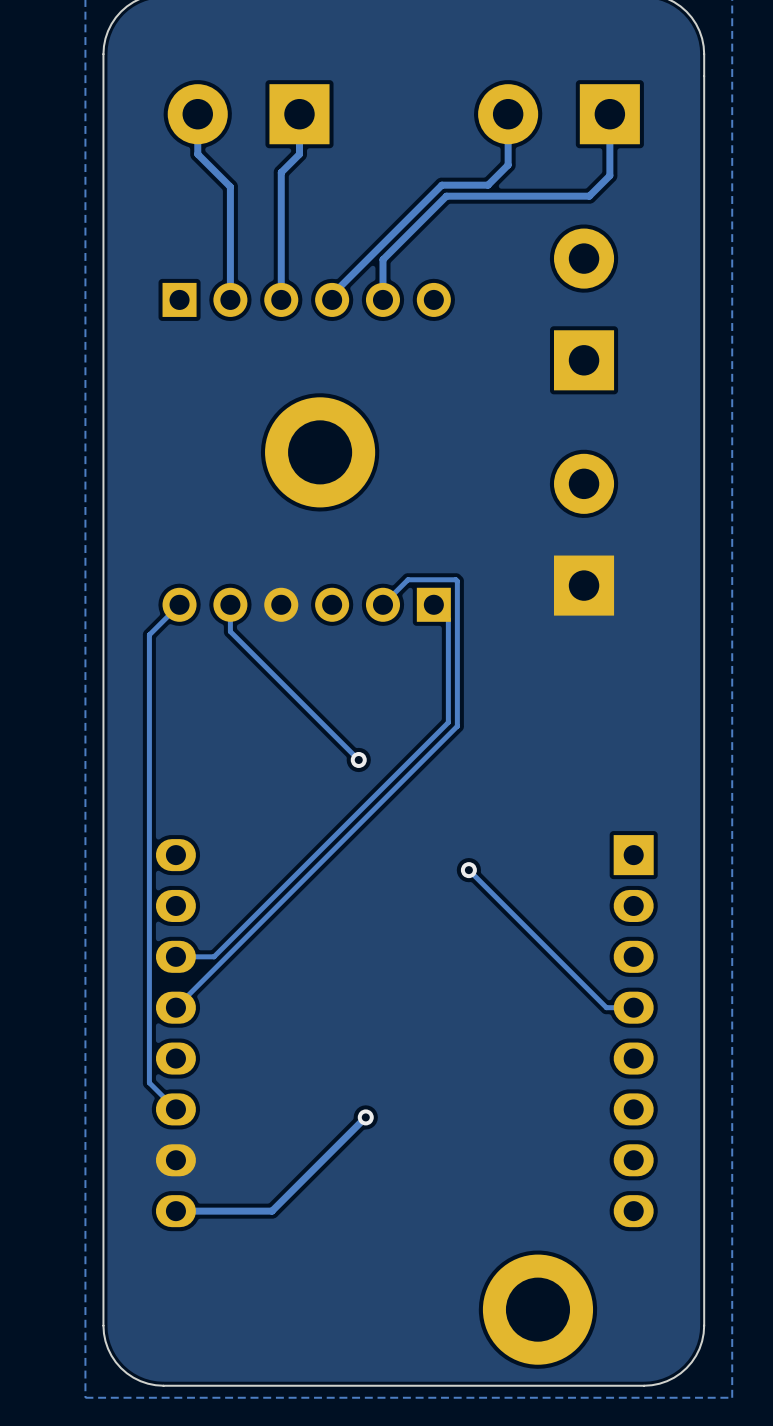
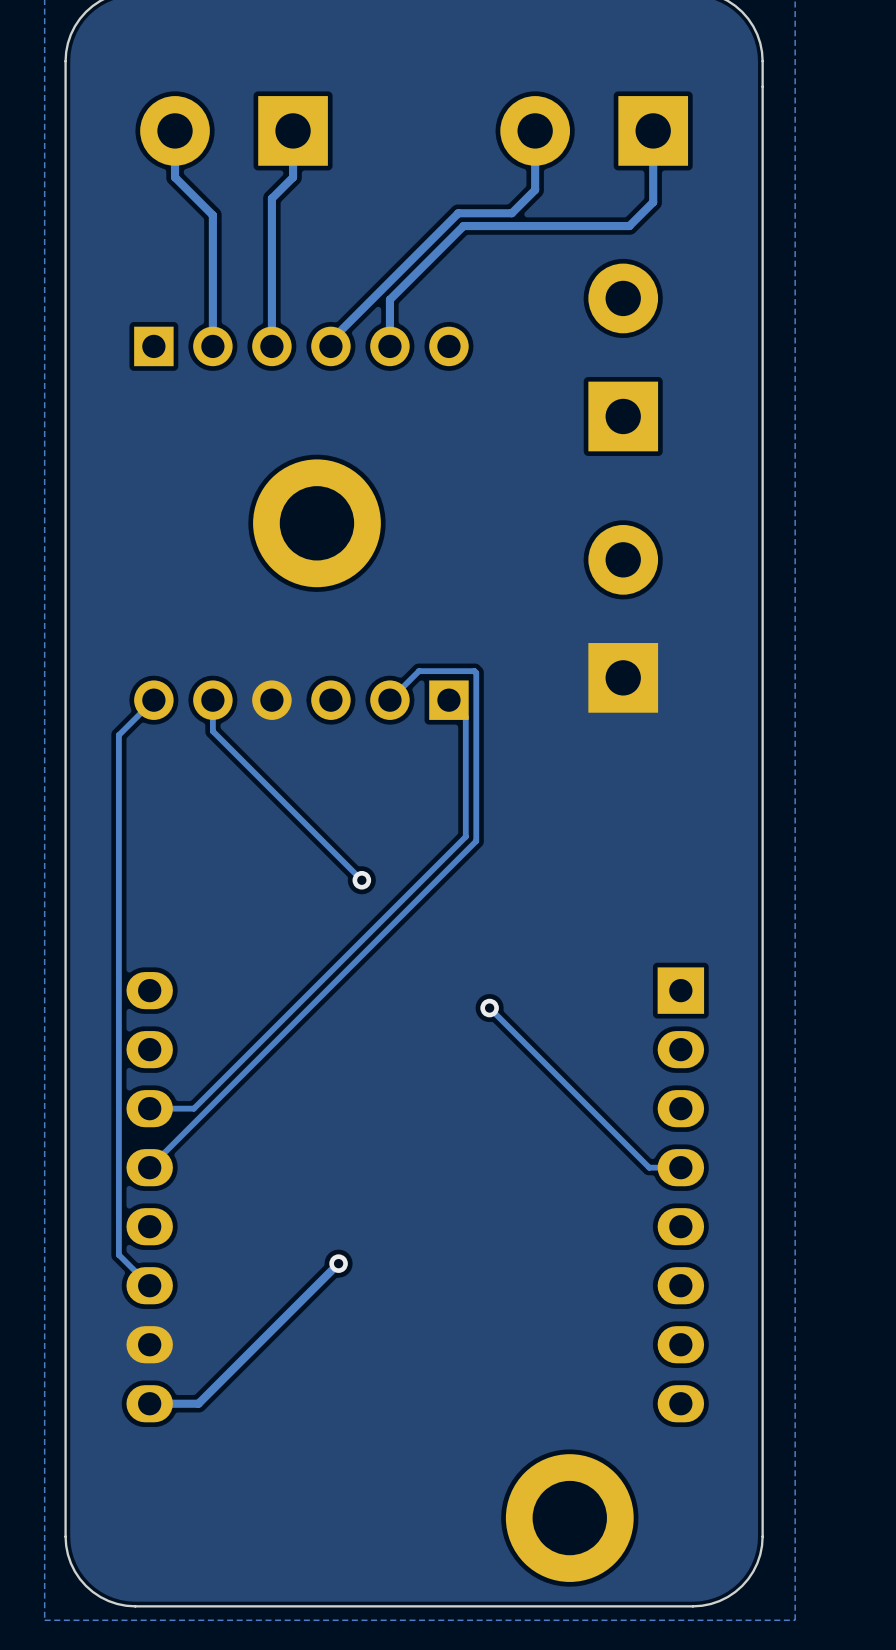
track: (365, 1117) (272, 1211) (217, 1211) -> (338, 1263) (198, 1403)
via position: (365, 1117) -> (338, 1263)

